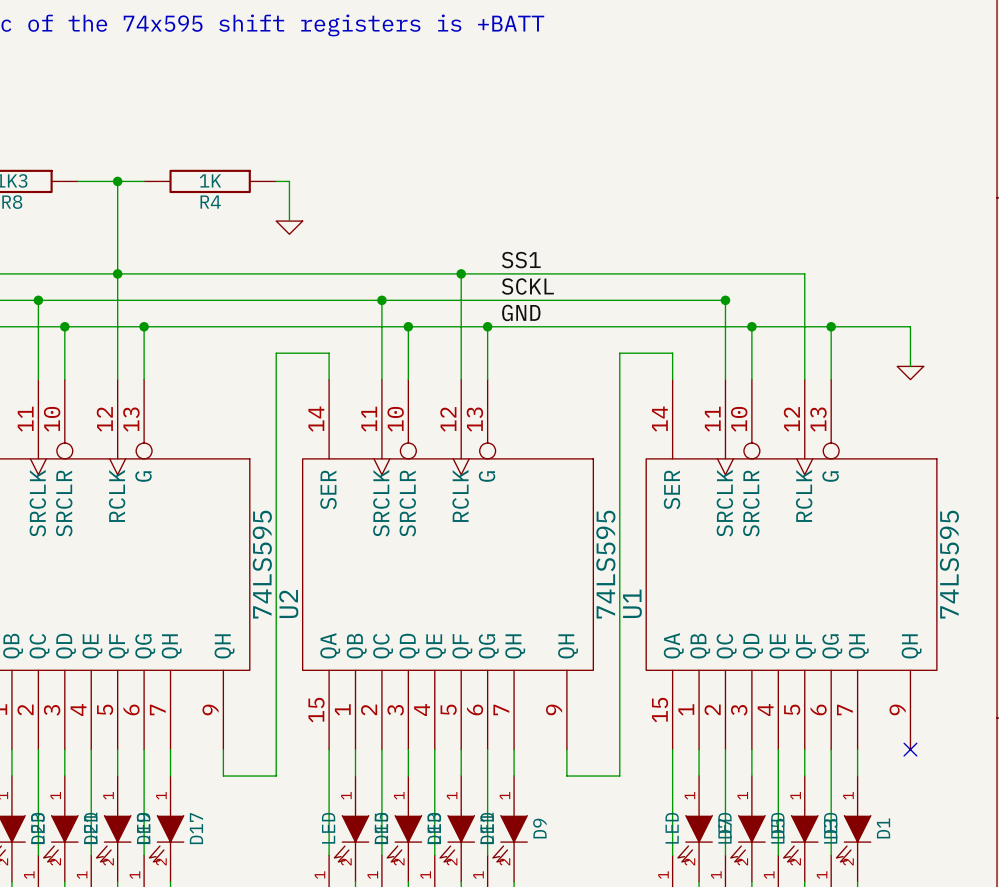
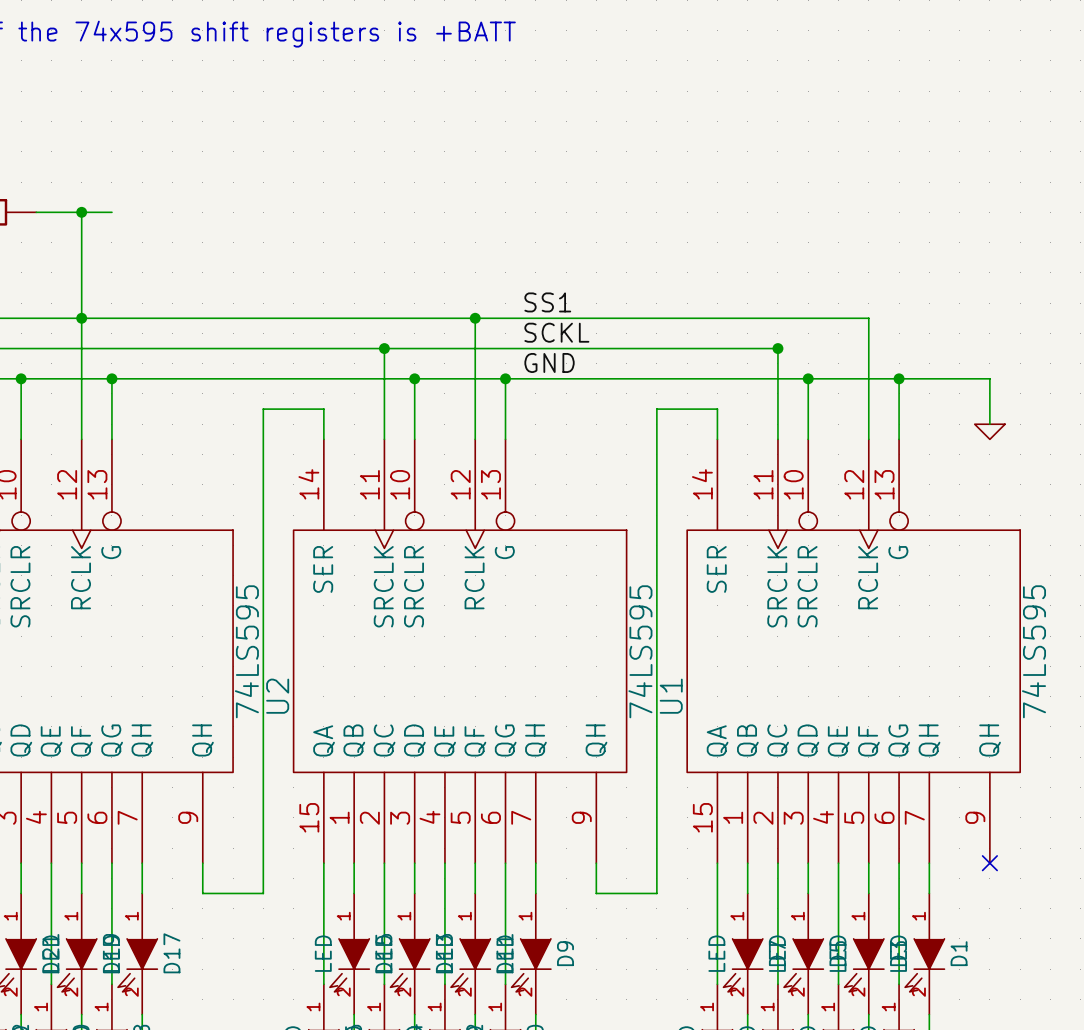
R4: 1K (210, 181) -> none
wire: (276, 181) (289, 181) (289, 221) -> none
power symbol: (289, 227) -> none

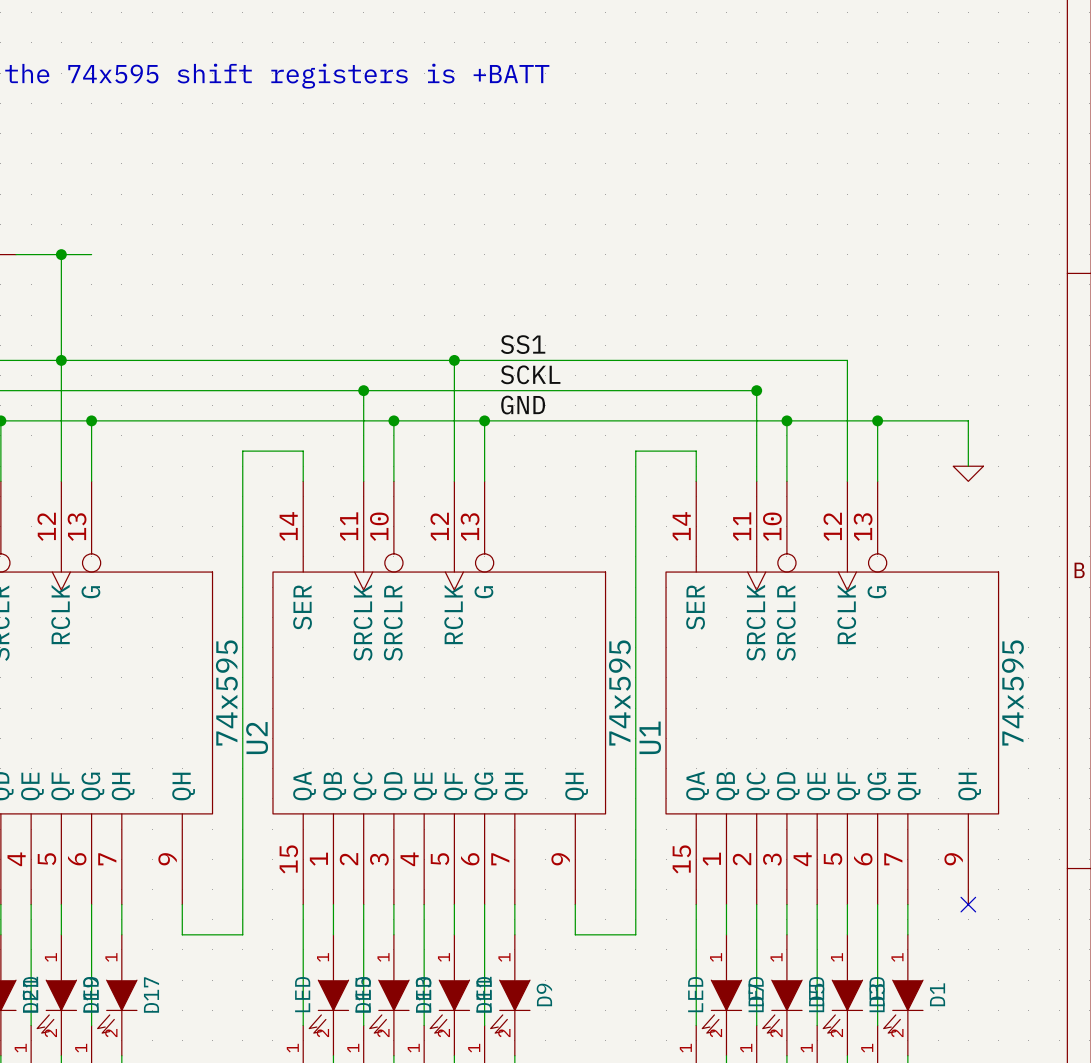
part value: 74LS595 (246, 651) -> 74x595 (226, 693)
U2 value: 74LS595 (640, 651) -> 74x595 (619, 693)
U1 value: 74LS595 (1034, 651) -> 74x595 (1012, 693)

